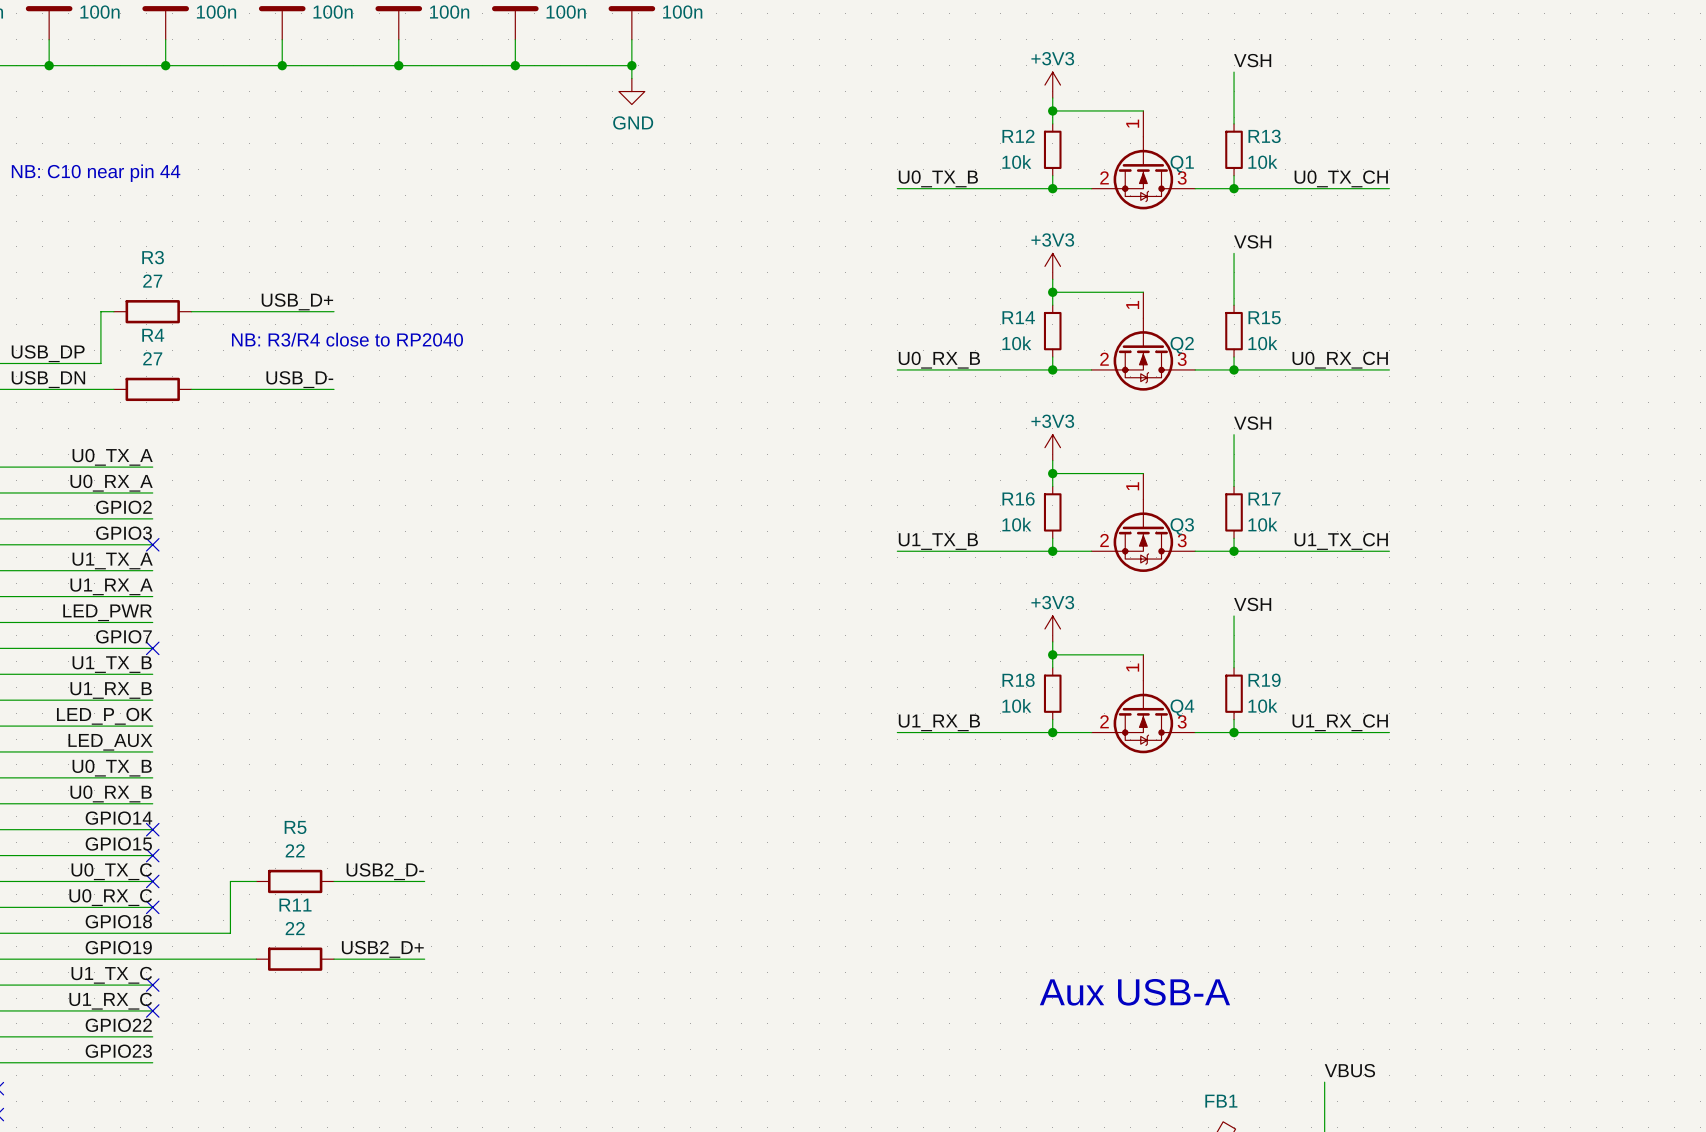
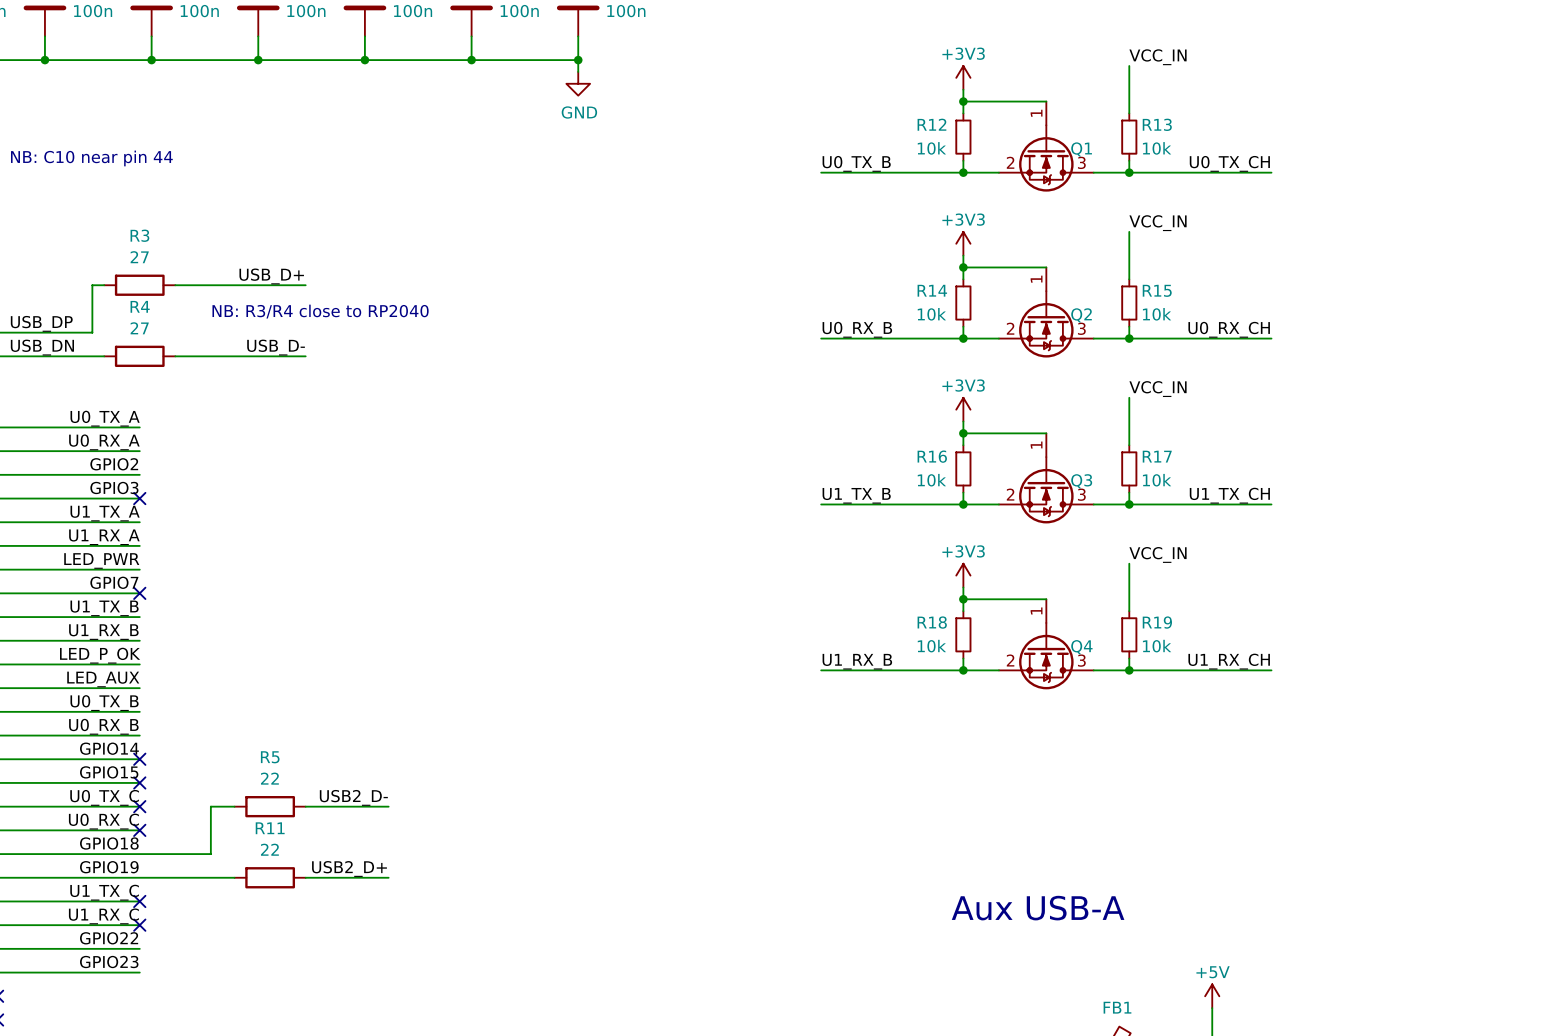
label: VSH (1252, 60) -> VCC_IN (1158, 57)
label: VSH (1252, 241) -> VCC_IN (1158, 223)
label: VSH (1252, 423) -> VCC_IN (1158, 389)
label: VSH (1252, 604) -> VCC_IN (1158, 554)
label: VBUS (1349, 1070) -> none
power symbol: none -> +5V (1212, 996)

